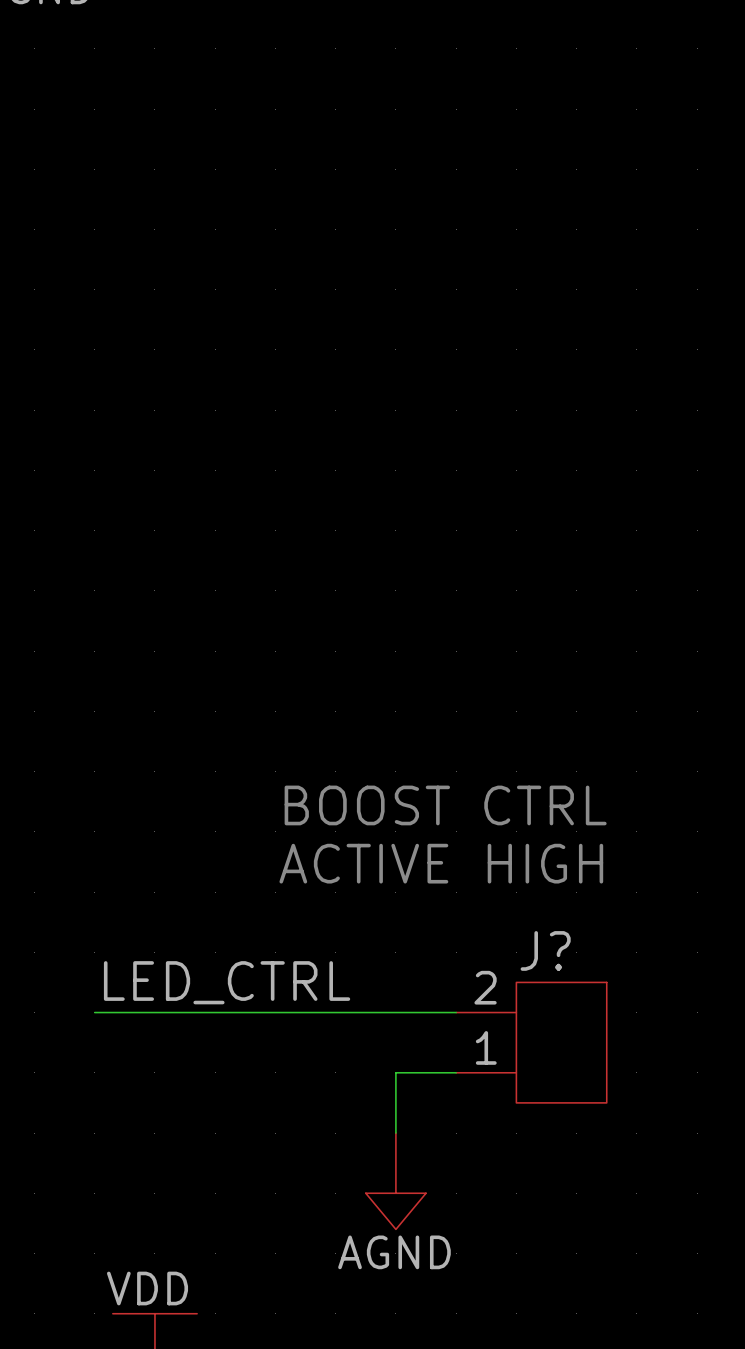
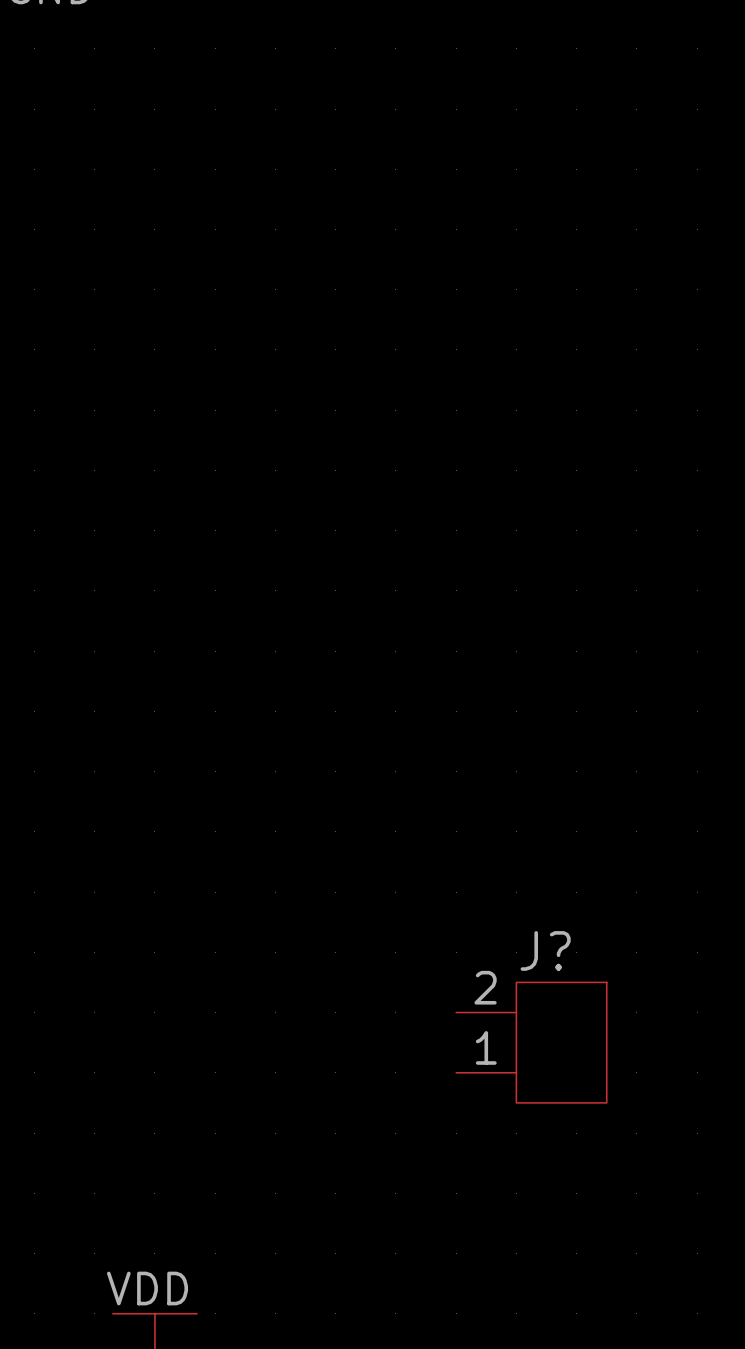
text: BOOST CTRL (445, 805) -> none
text: ACTIVE HIGH (441, 863) -> none
label: LED_CTRL (227, 982) -> none
wire: (94, 1012) (456, 1012) -> none
wire: (456, 1072) (395, 1072) (395, 1133) -> none
power symbol: AGND (395, 1181) -> none

